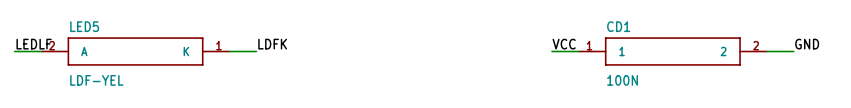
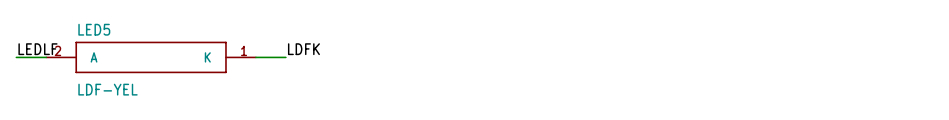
label: VCC (564, 44) -> none
label: GND (807, 44) -> none
wire: (551, 51) (578, 51) -> none
CD1: 100N (672, 51) -> none
wire: (766, 51) (793, 51) -> none

